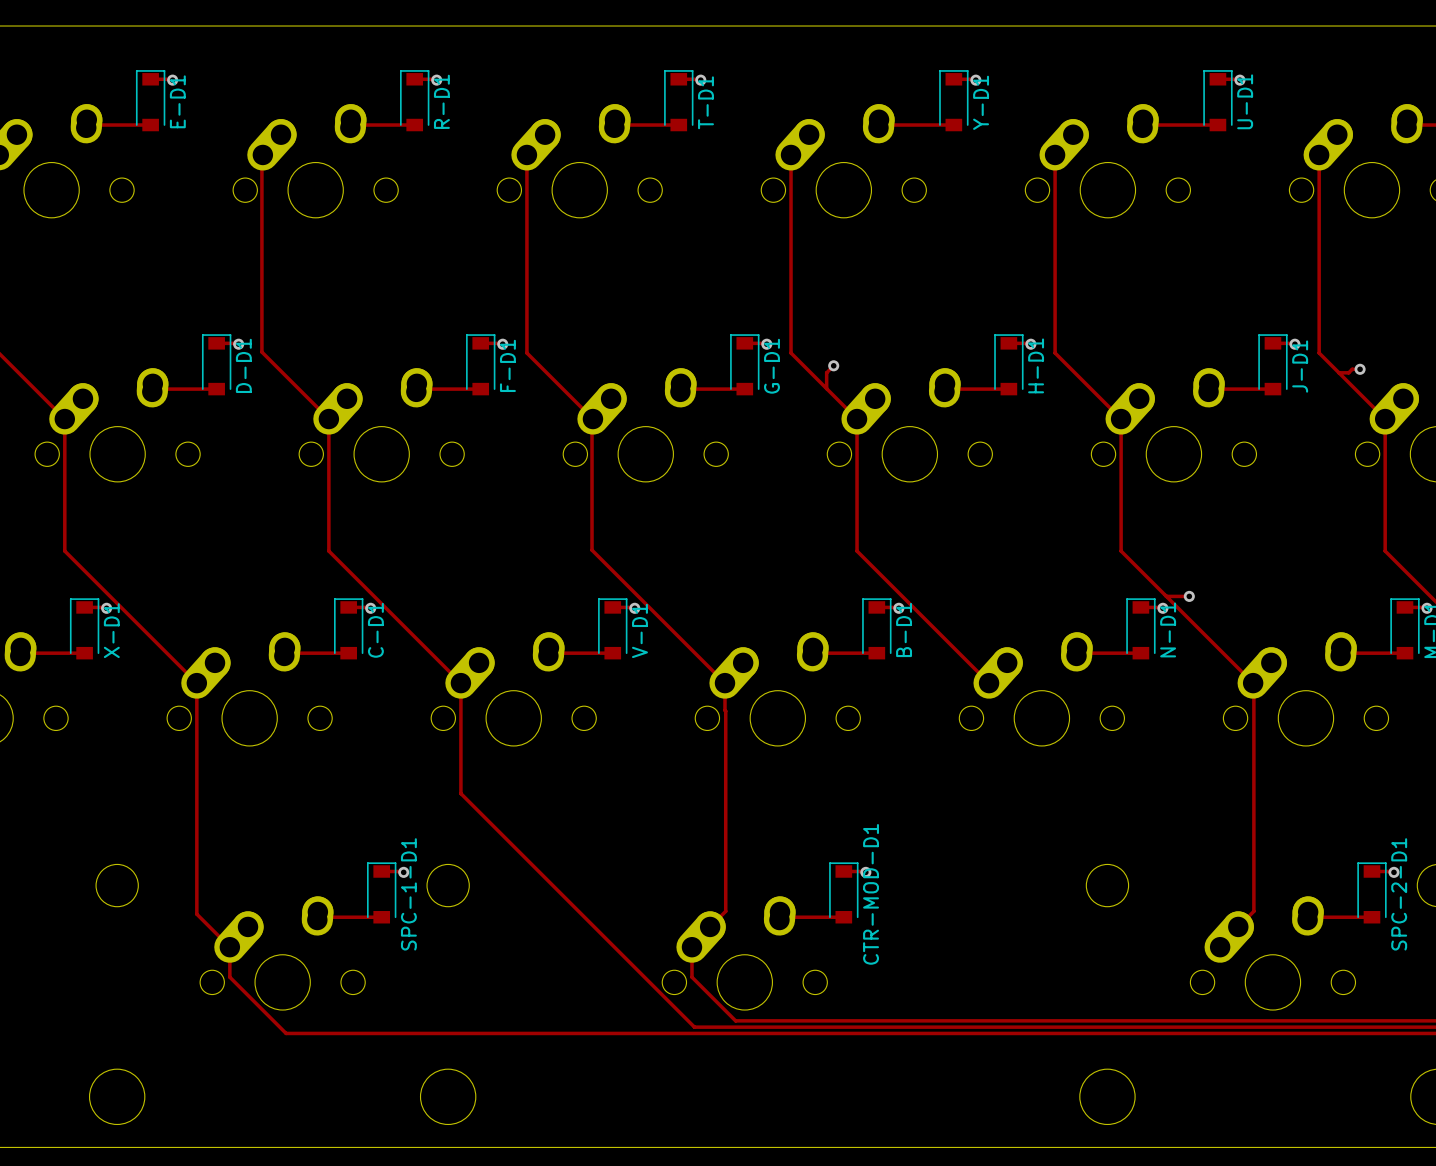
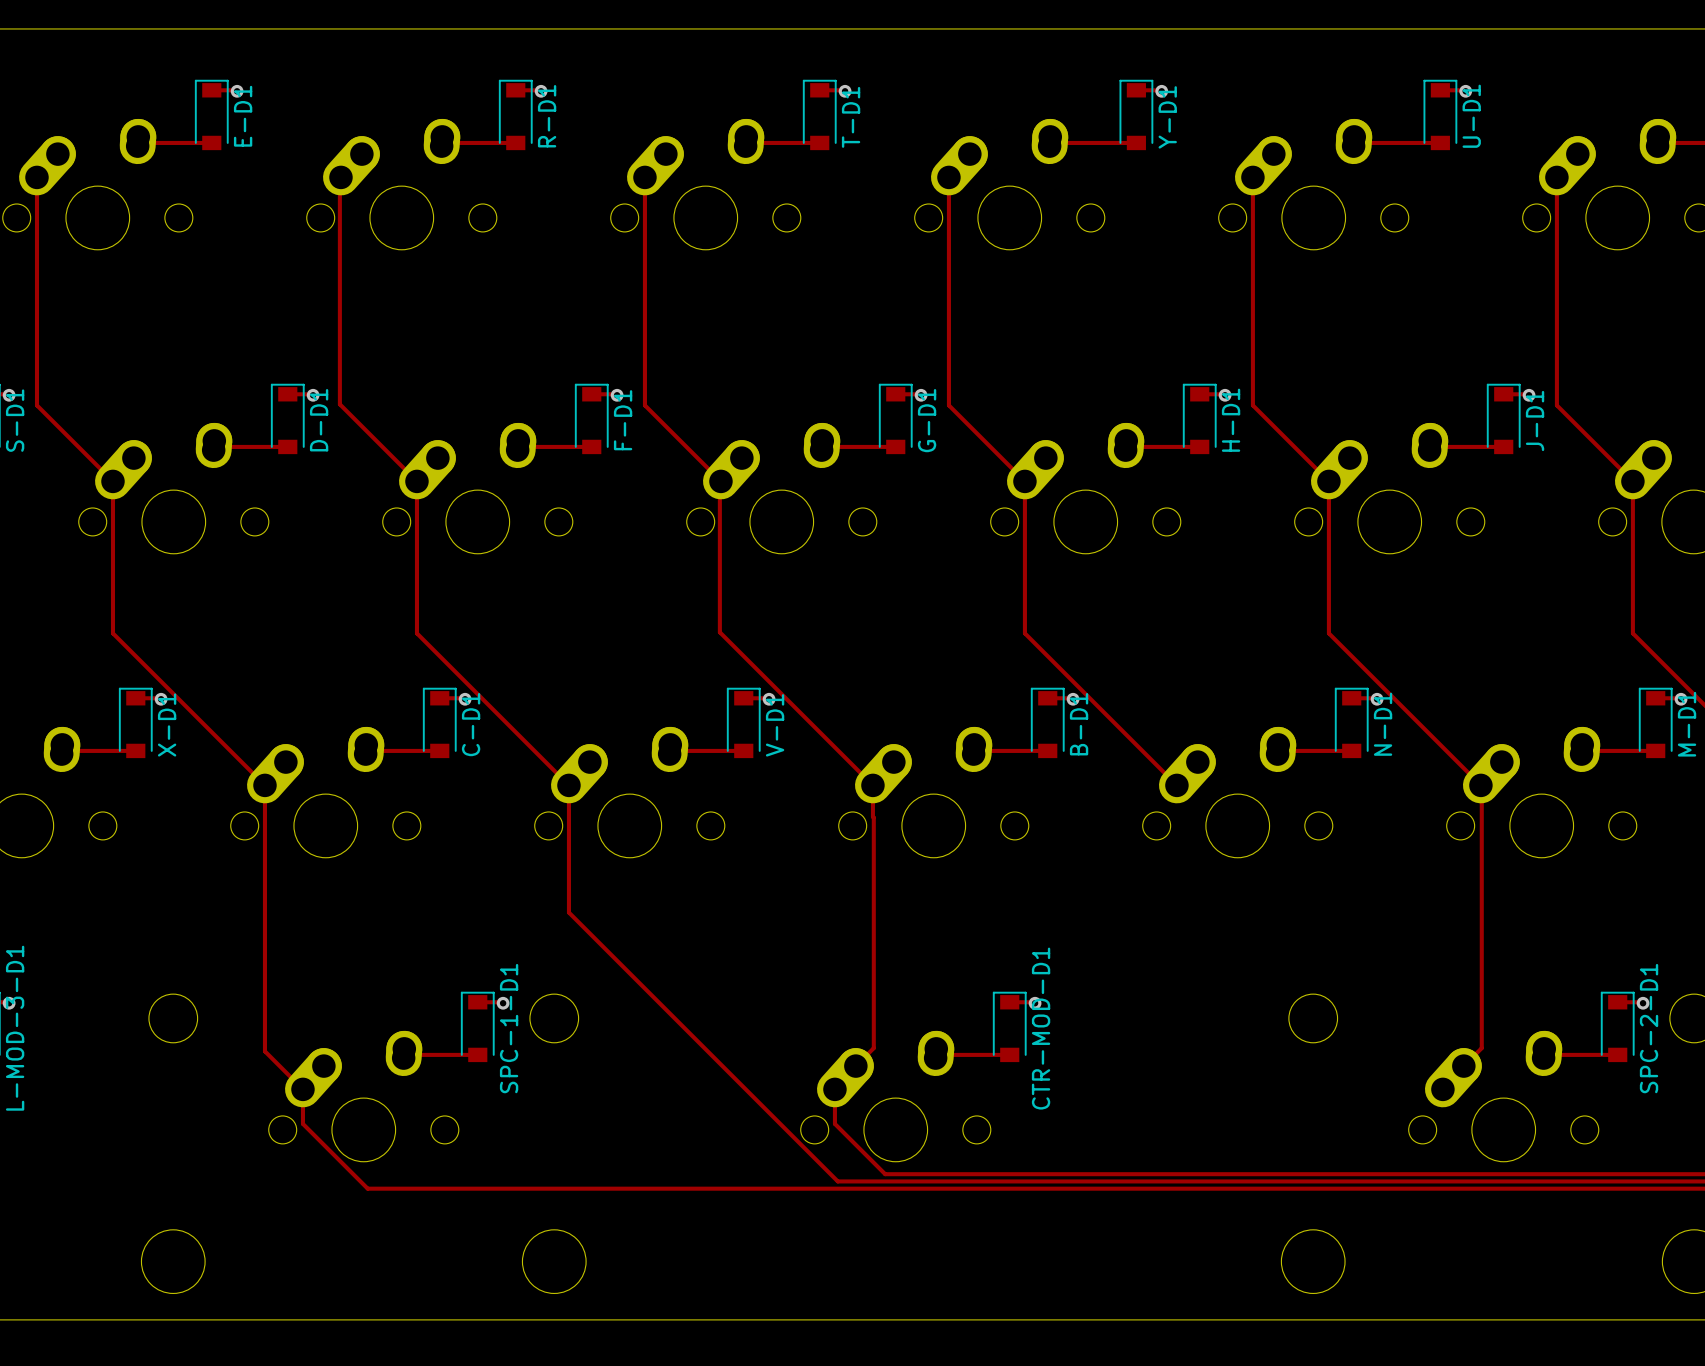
track: (833, 365) (826, 372) (826, 388) -> none
via: (833, 365) -> none
track: (1360, 369) (1352, 369) (1348, 372) (1338, 372) -> none
via: (1360, 369) -> none
track: (1166, 596) (1189, 596) -> none
via: (1189, 596) -> none

